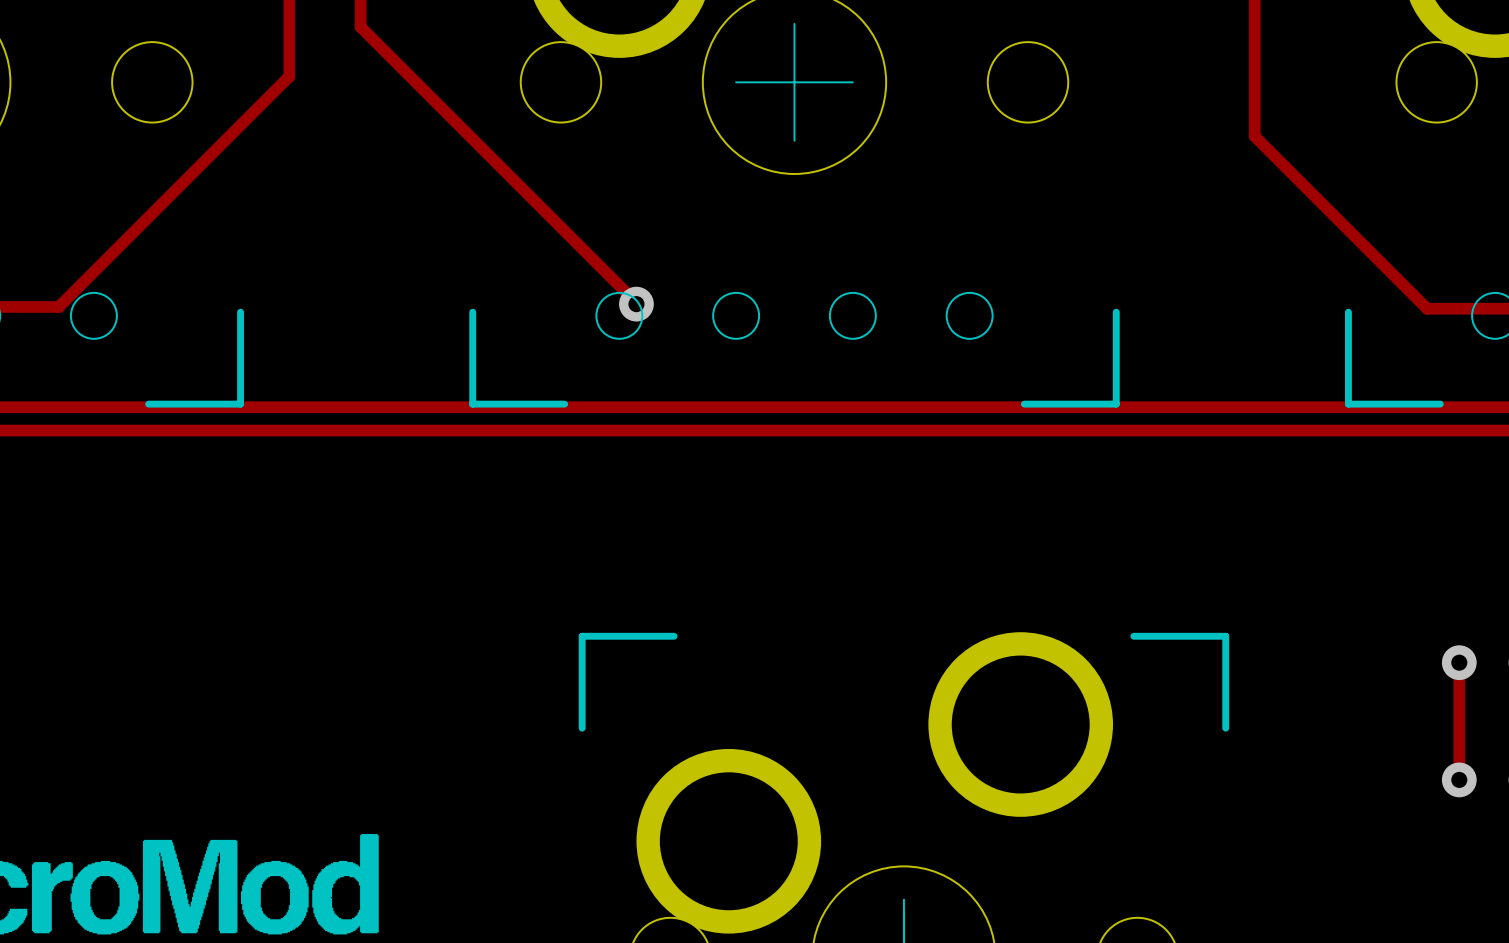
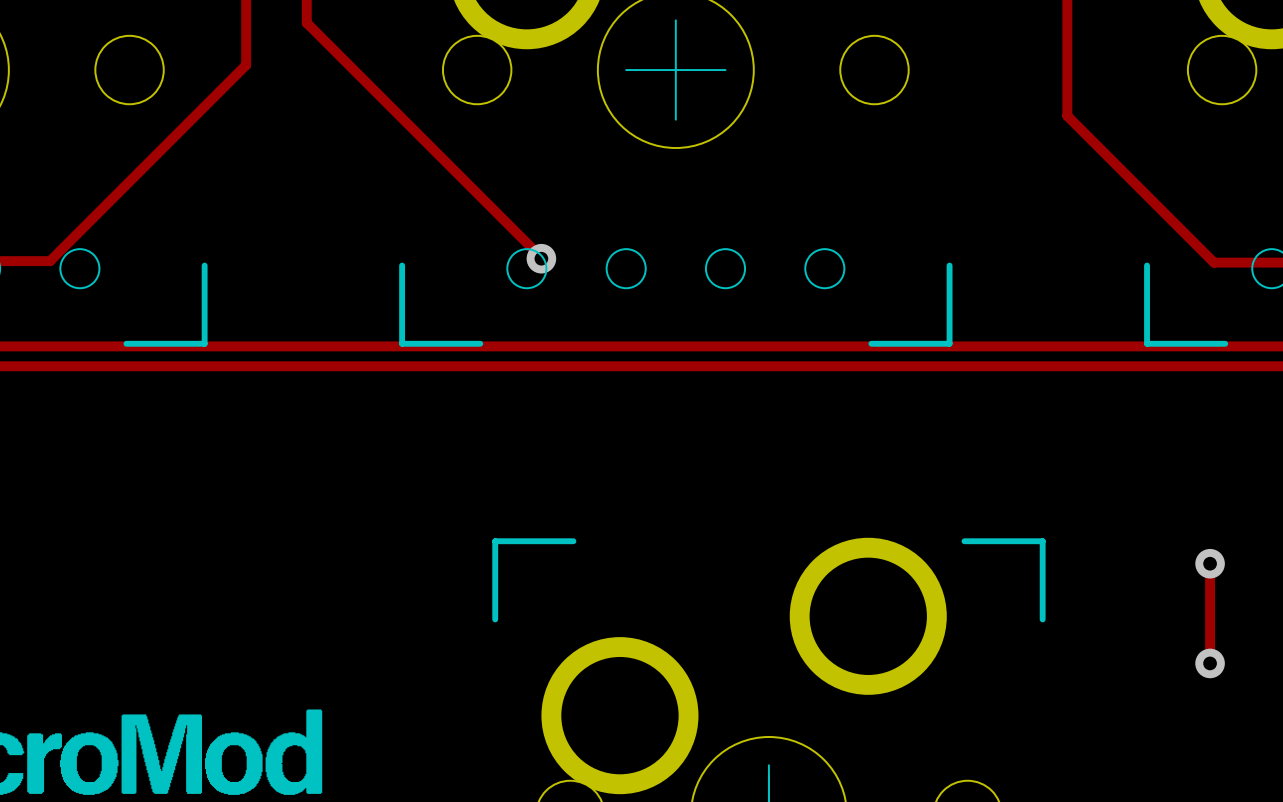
track: (1459, 662) (1459, 779) -> (1210, 563) (1210, 663)
via position: (1459, 662) -> (1210, 563)
via position: (1459, 779) -> (1210, 663)

